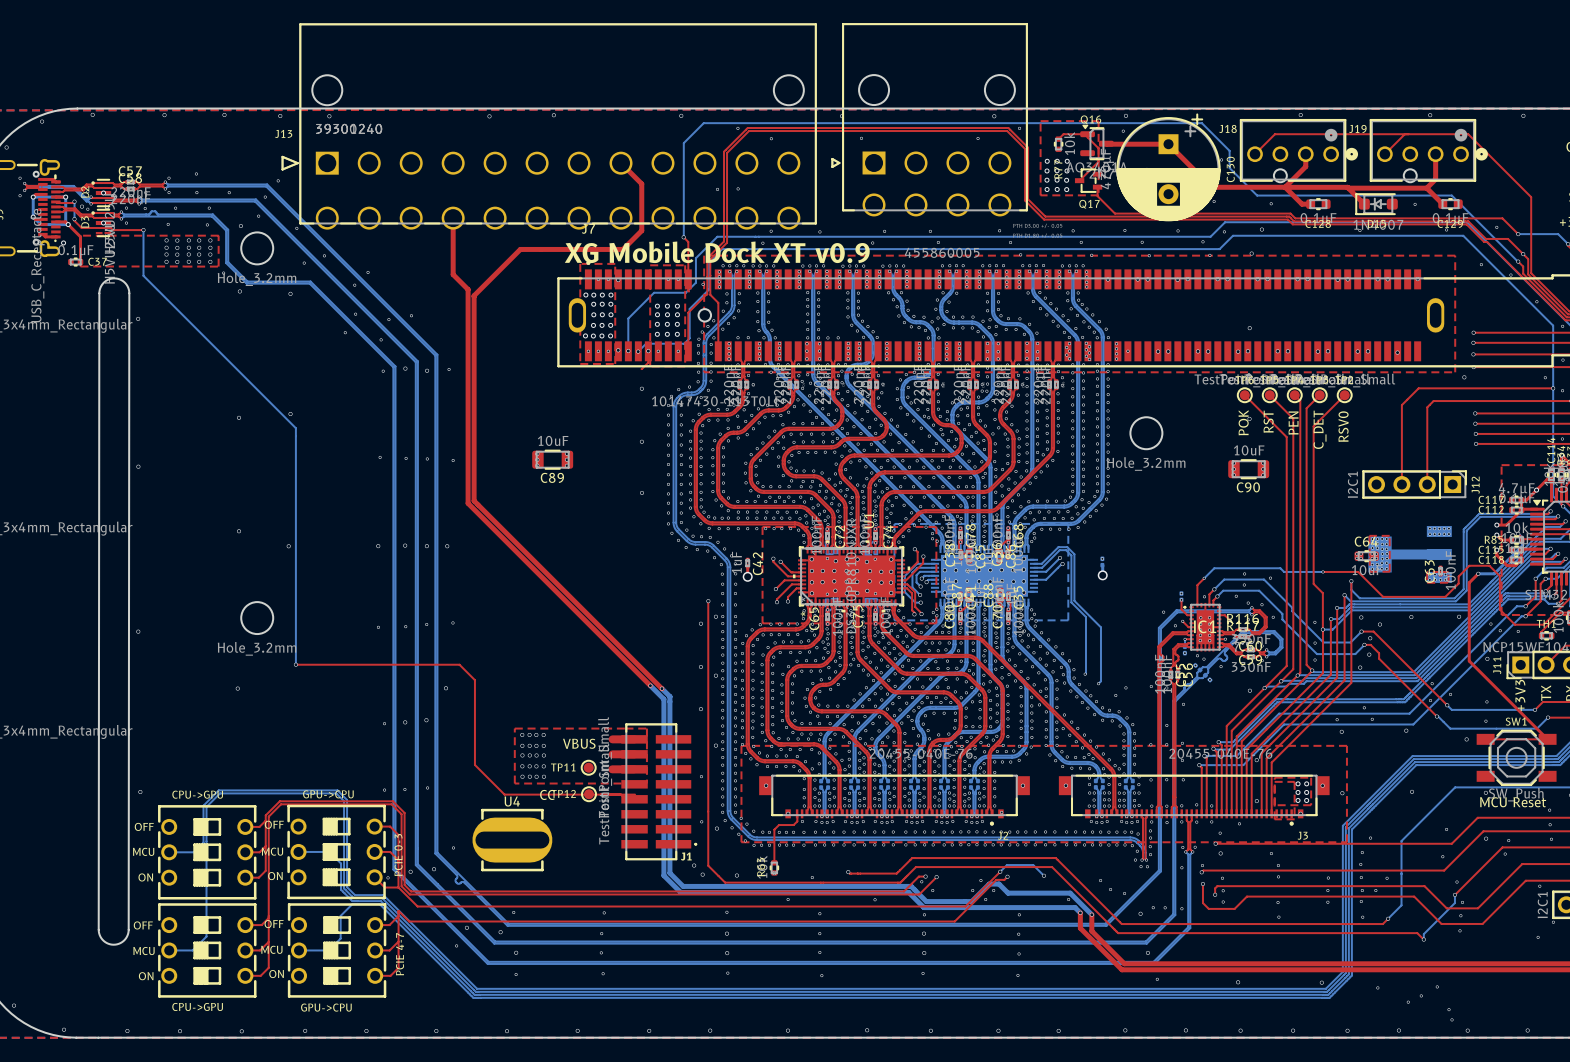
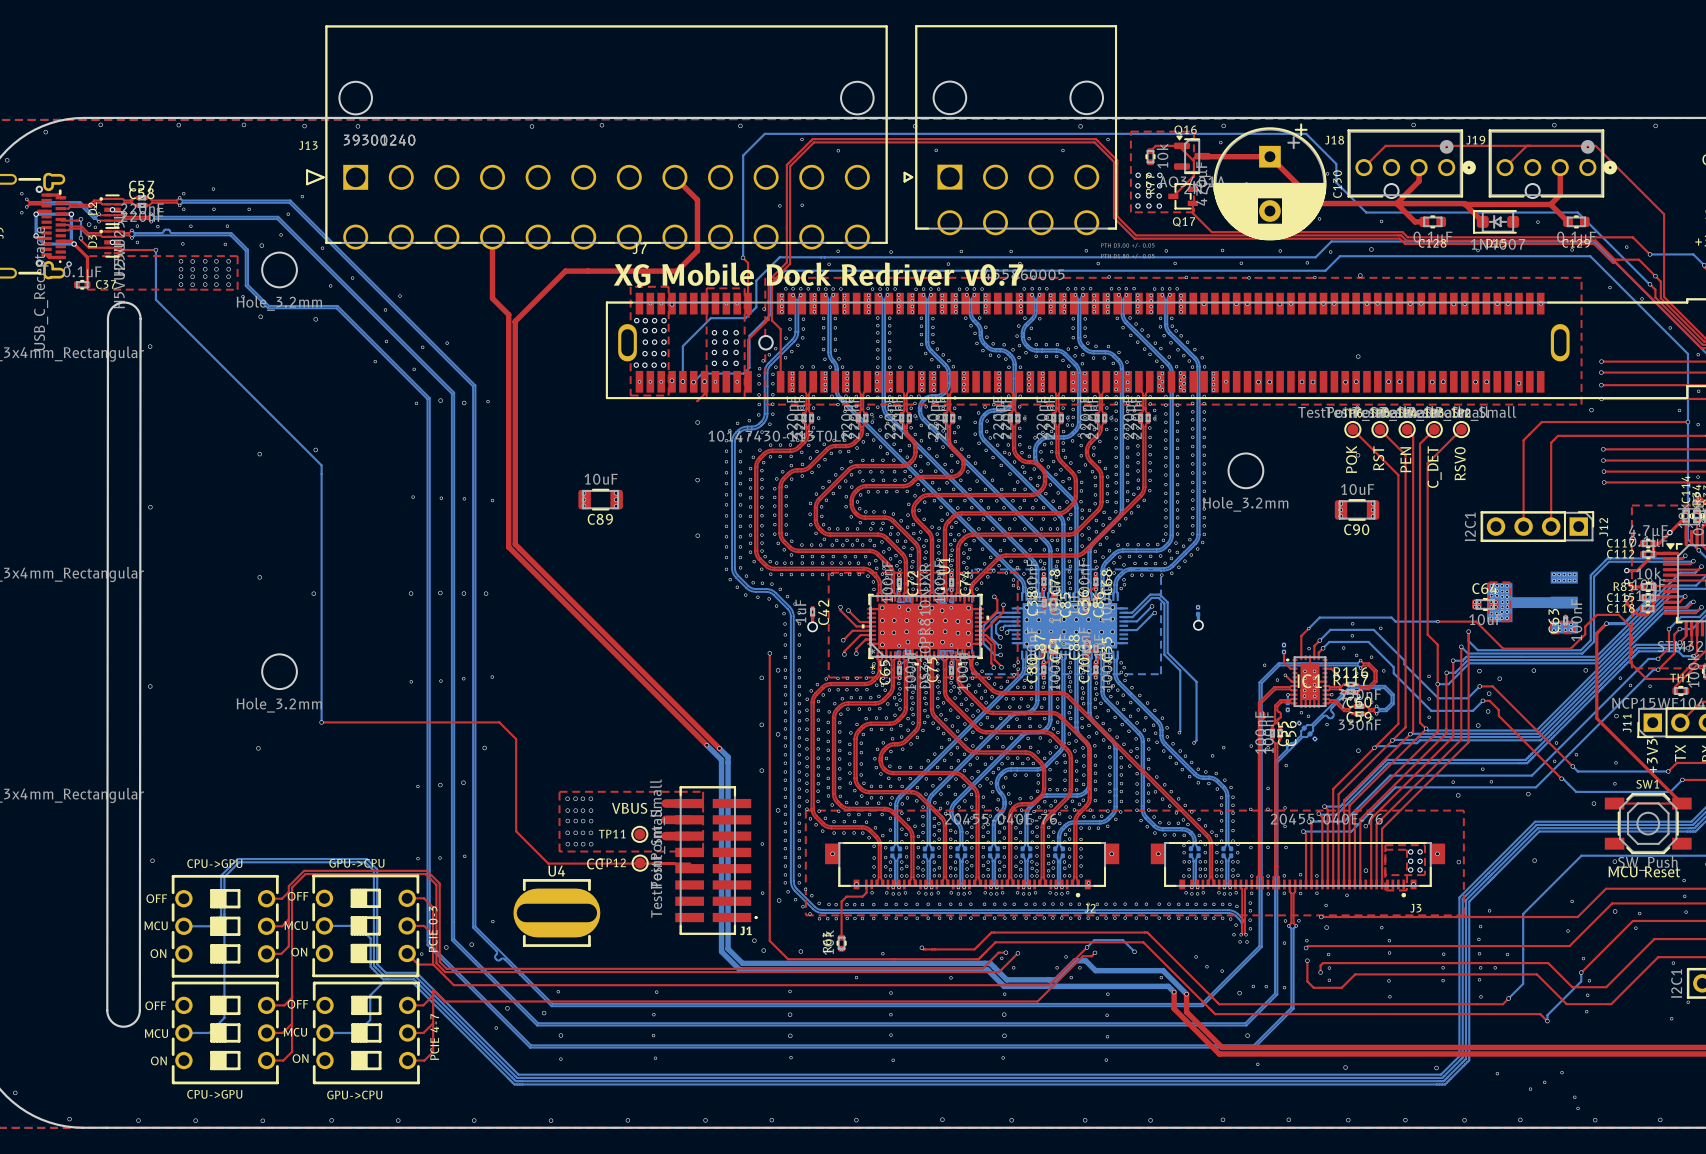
text: XG Mobile Dock XT v0.9 (717, 252) -> XG Mobile Dock Redriver v0.7 (818, 274)

